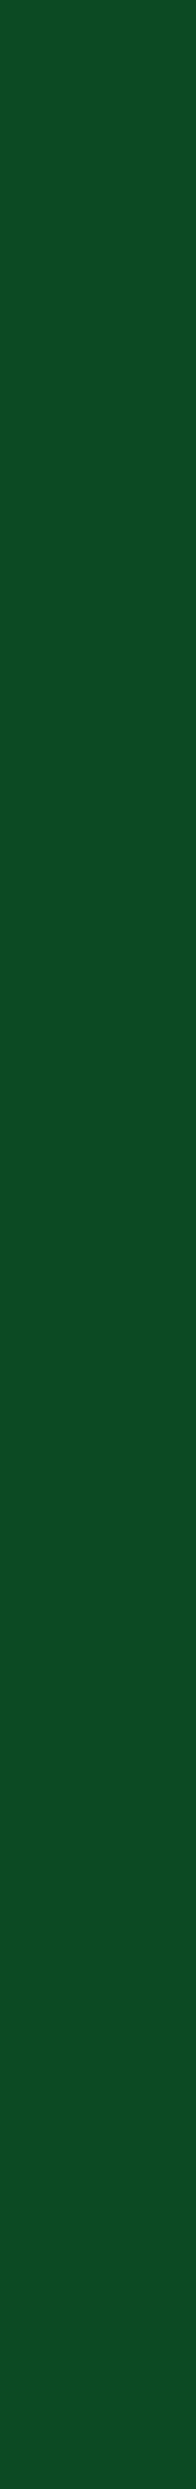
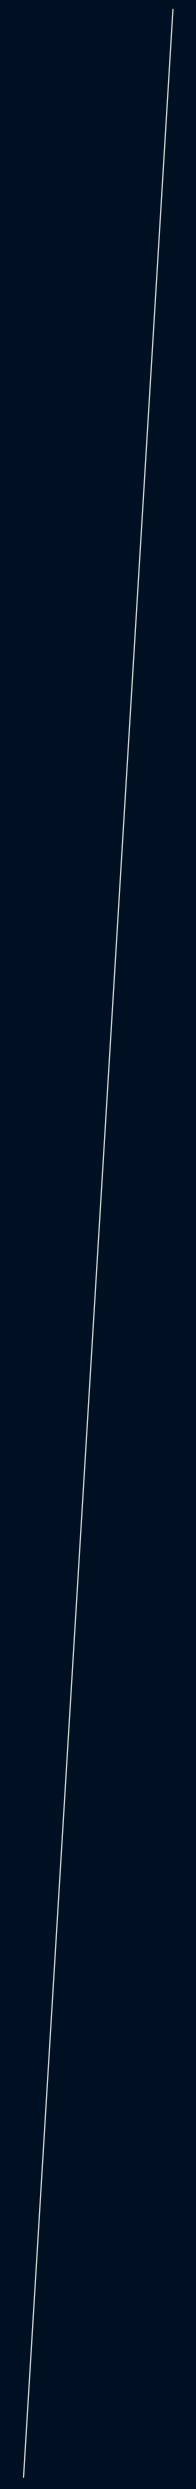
board edge: none -> (172, 9) (23, 2477)

